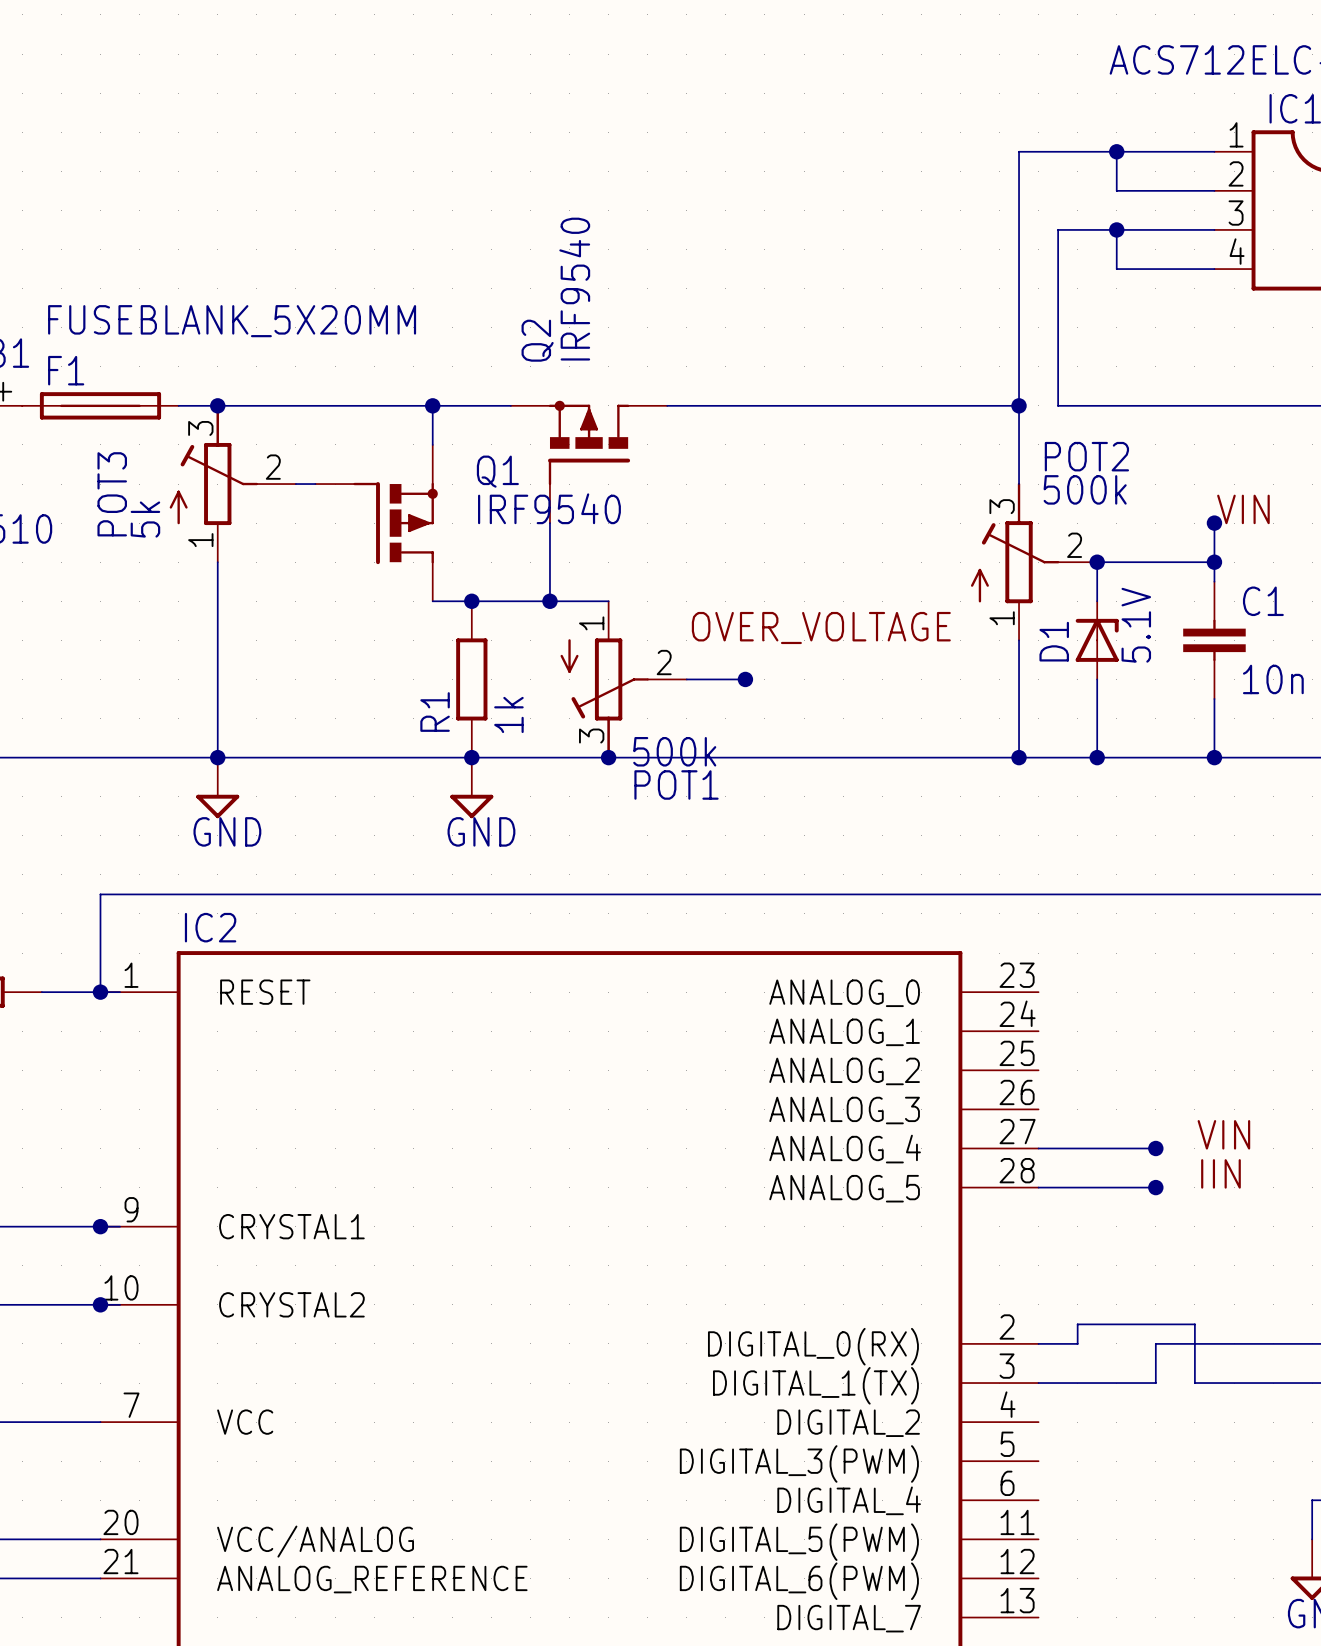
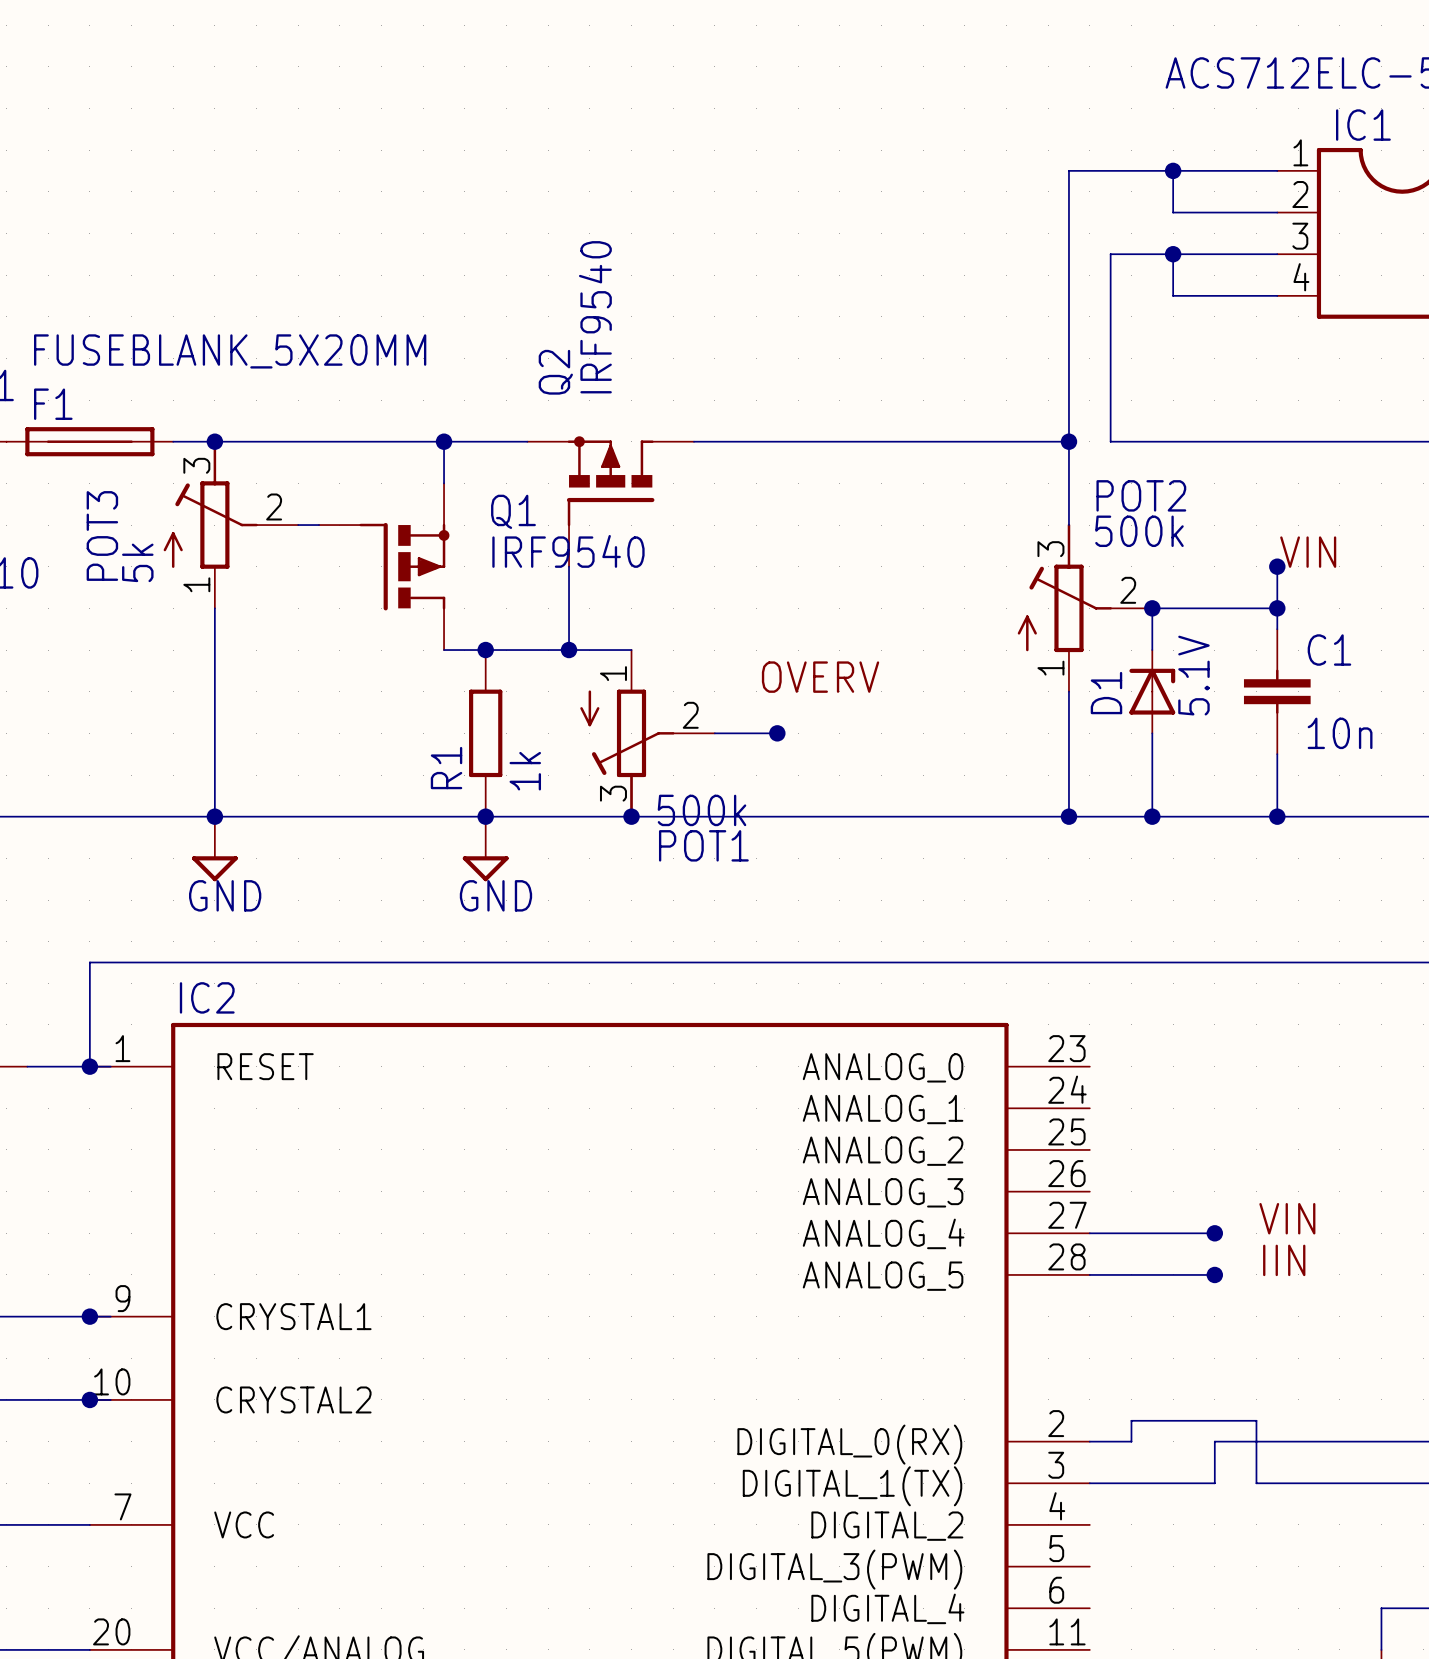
label: none -> OVERV (820, 677)
label: OVER_VOLTAGE (821, 627) -> none

